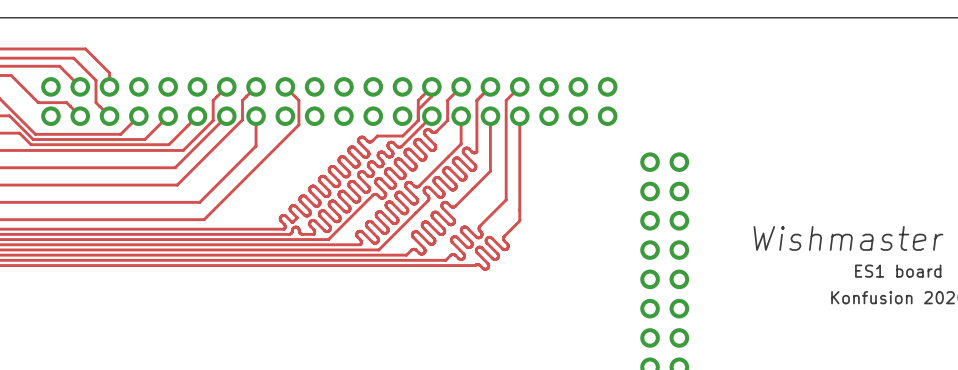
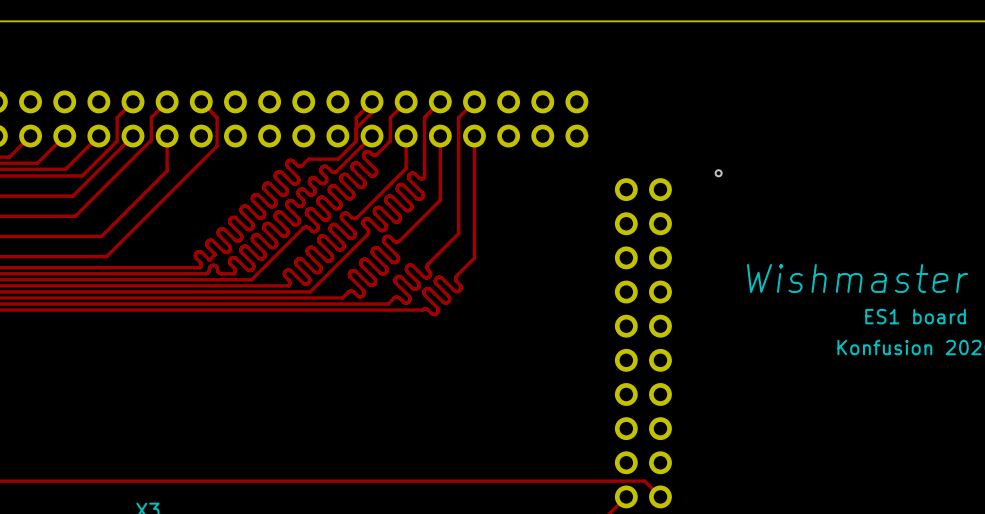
via: none -> (718, 173)

